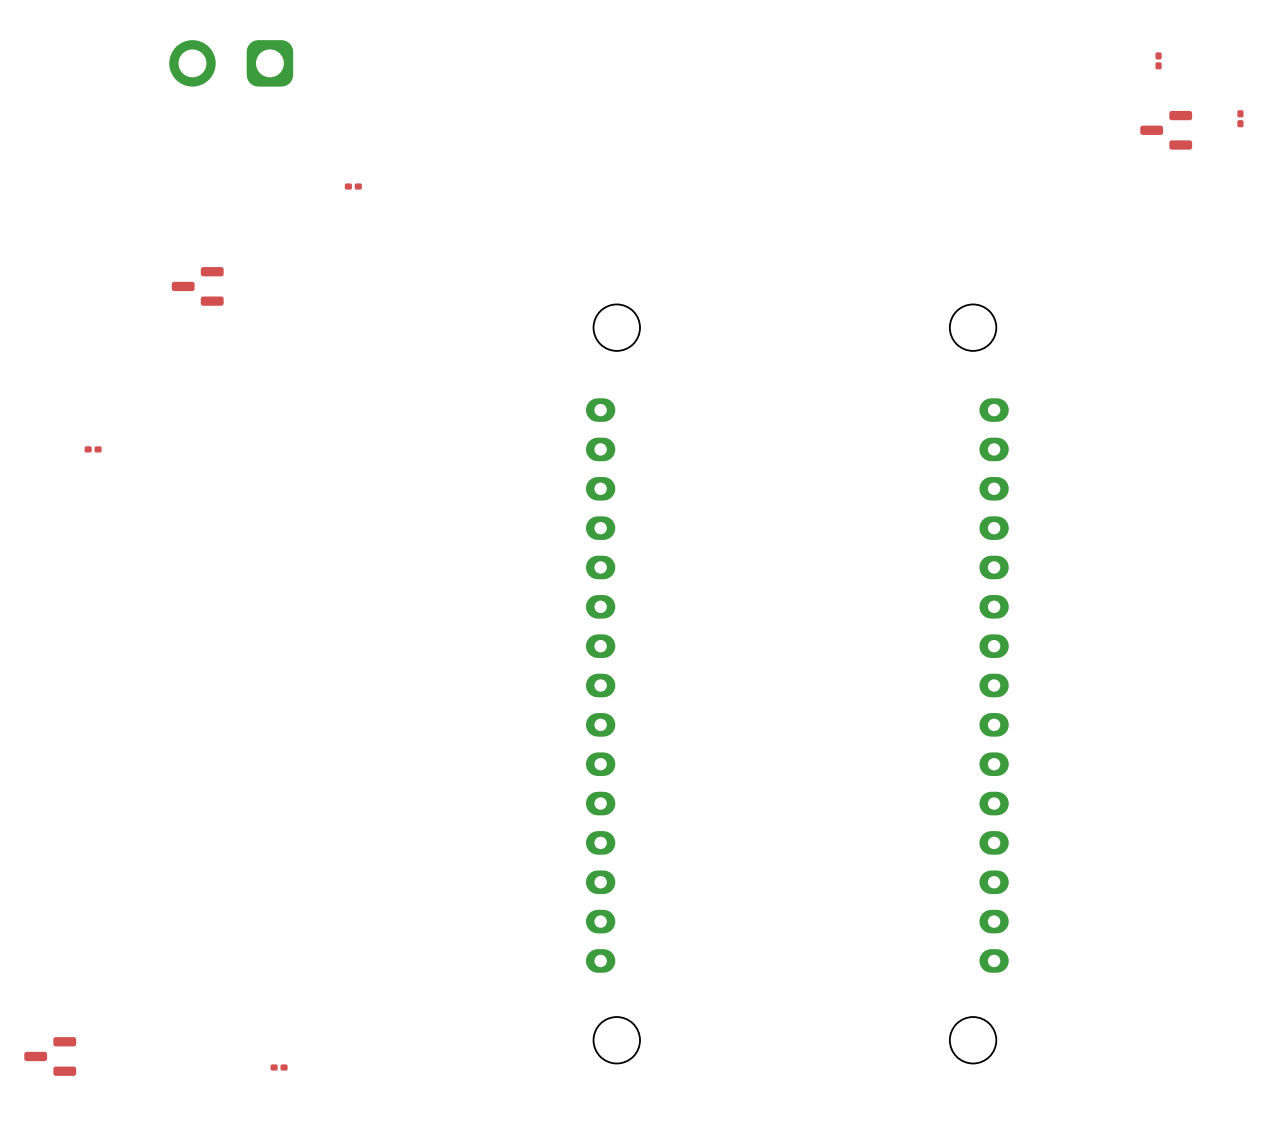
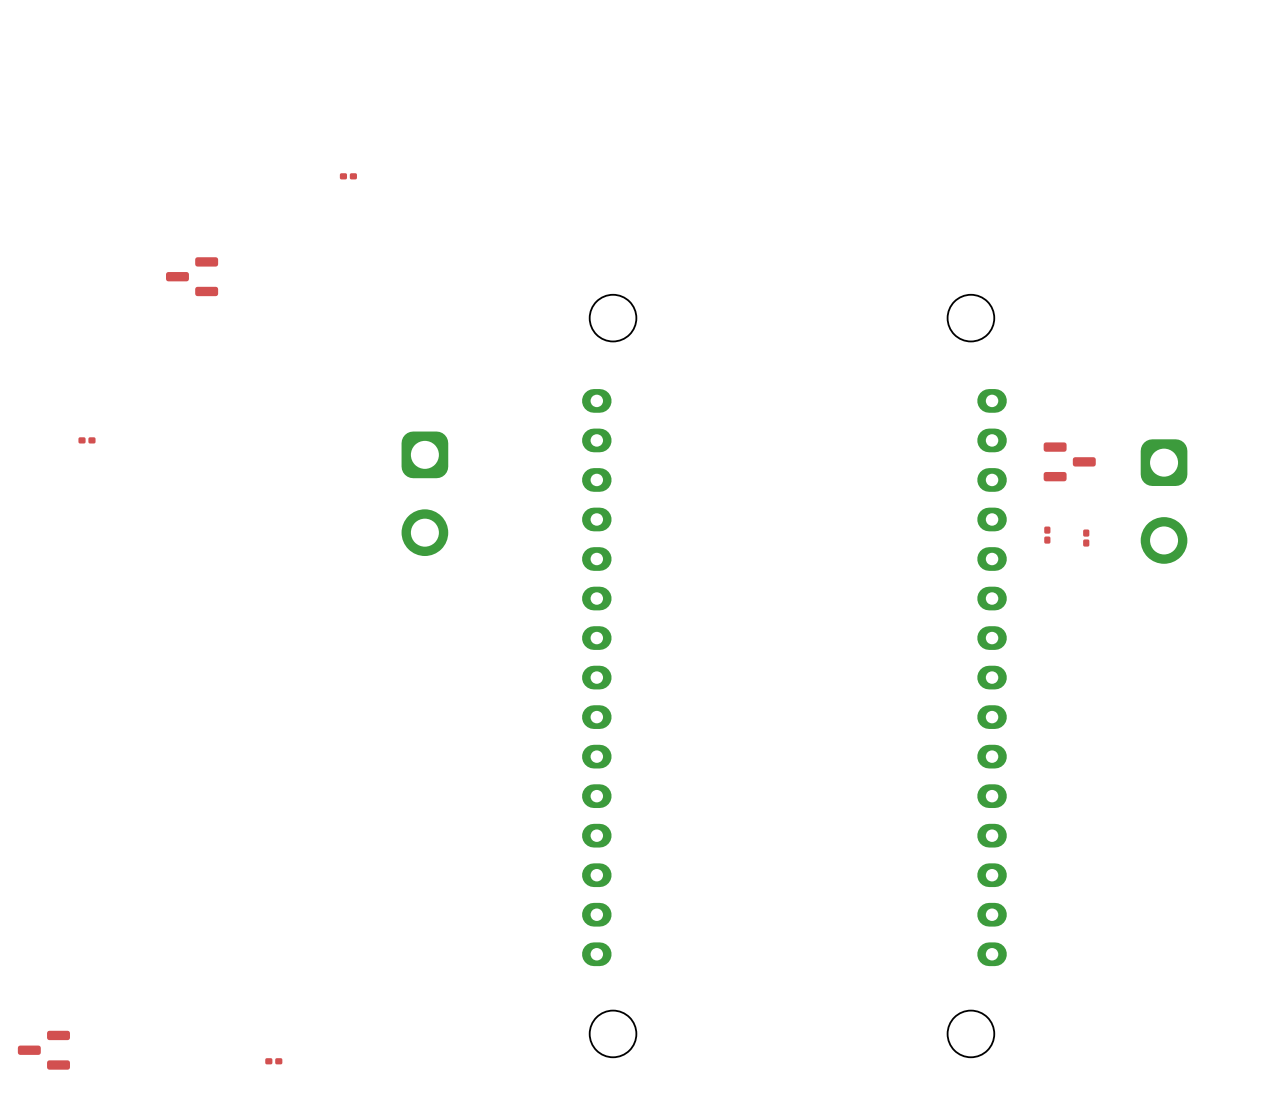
part: (1158, 60) -> none
part: (231, 63) -> none
part: (1240, 118) -> none
part rotation: 0° (1166, 130) -> 180° (1069, 461)
part position: (1166, 130) -> (1069, 461)
part: none -> (424, 493)
part: none -> (1164, 501)
part: none -> (1047, 535)
part: none -> (1086, 538)

